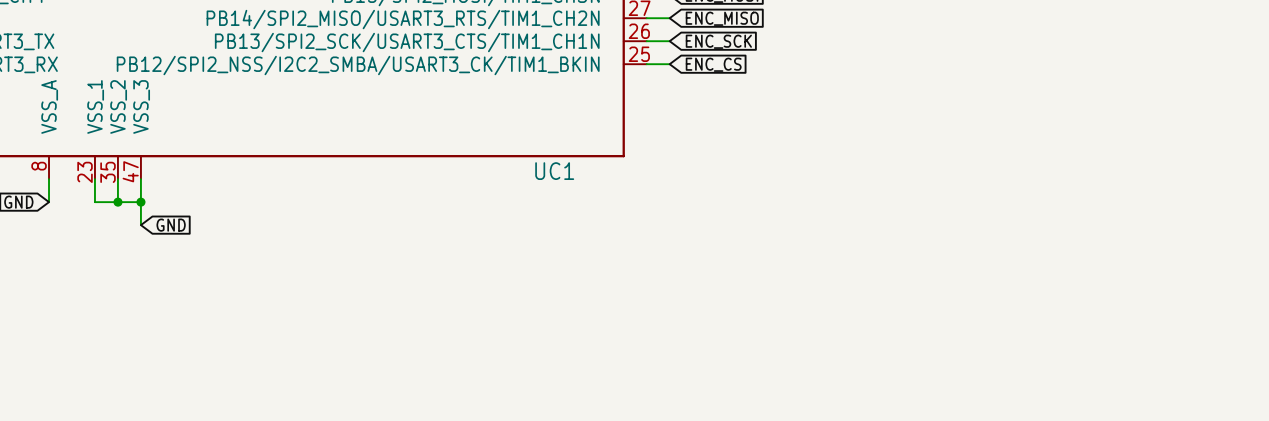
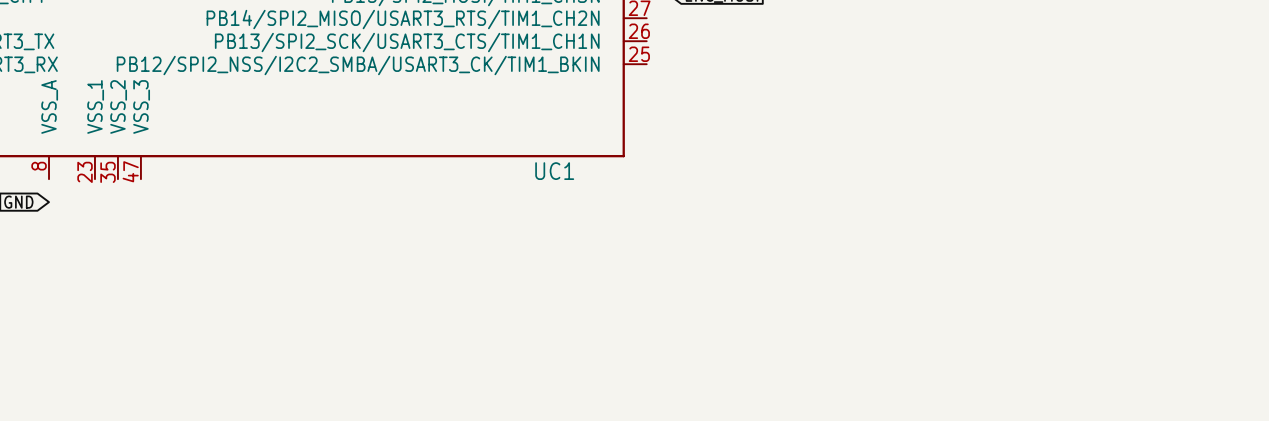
wire: (646, 18) (669, 18) -> none
global label: ENC_MISO (722, 18) -> none
wire: (646, 41) (669, 41) -> none
global label: ENC_SCK (718, 41) -> none
wire: (646, 64) (669, 64) -> none
global label: ENC_CS (713, 64) -> none
wire: (49, 179) (49, 202) -> none
wire: (94, 179) (94, 202) (140, 202) -> none
wire: (117, 179) (117, 202) -> none
wire: (140, 179) (140, 225) -> none
junction: (117, 202) -> none
junction: (140, 202) -> none
global label: GND (171, 225) -> none

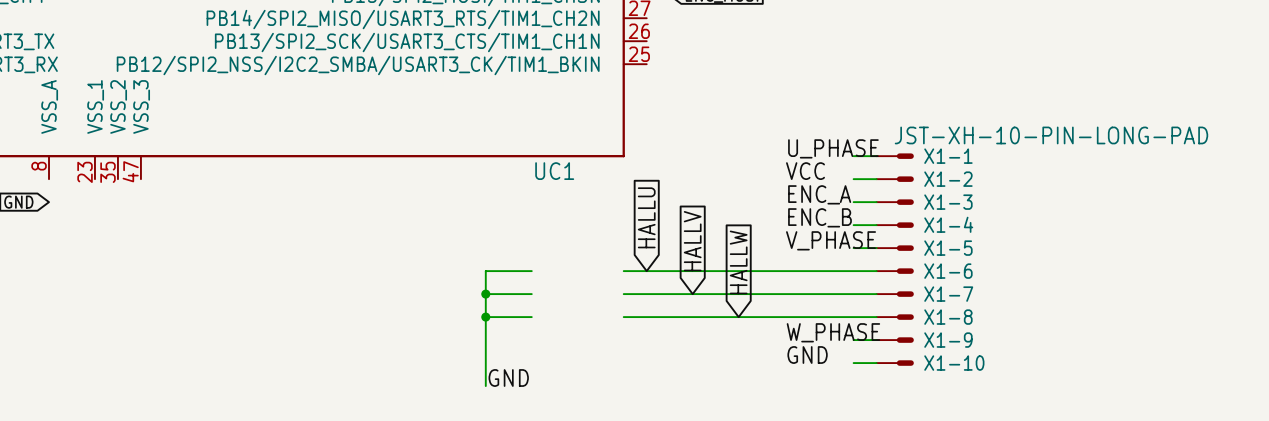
label: none -> U_PHASE (833, 148)
wire: none -> (853, 156) (876, 156)
X1-1: none -> JST-XH-10-PIN-LONG-PAD (895, 156)
label: none -> VCC (805, 171)
wire: none -> (853, 179) (876, 179)
X1-2: none -> (895, 179)
label: none -> ENC_A (819, 194)
wire: none -> (853, 202) (876, 202)
X1-3: none -> (895, 202)
global label: none -> HALLU (646, 217)
label: none -> ENC_B (819, 217)
wire: none -> (853, 225) (876, 225)
X1-4: none -> (895, 225)
label: none -> V_PHASE (831, 240)
global label: none -> HALLV (692, 241)
wire: none -> (853, 248) (876, 248)
X1-5: none -> (895, 248)
global label: none -> HALLW (738, 262)
wire: none -> (531, 271) (485, 271) (485, 386)
wire: none -> (623, 271) (876, 271)
X1-6: none -> (895, 271)
wire: none -> (485, 294) (531, 294)
junction: none -> (485, 294)
wire: none -> (623, 294) (876, 294)
X1-7: none -> (895, 294)
wire: none -> (485, 317) (531, 317)
junction: none -> (485, 317)
wire: none -> (623, 317) (876, 317)
X1-8: none -> (895, 317)
label: none -> W_PHASE (833, 332)
wire: none -> (853, 340) (876, 340)
X1-9: none -> (895, 340)
label: none -> GND (807, 355)
wire: none -> (853, 363) (876, 363)
X1-10: none -> (895, 363)
label: none -> GND (508, 378)

